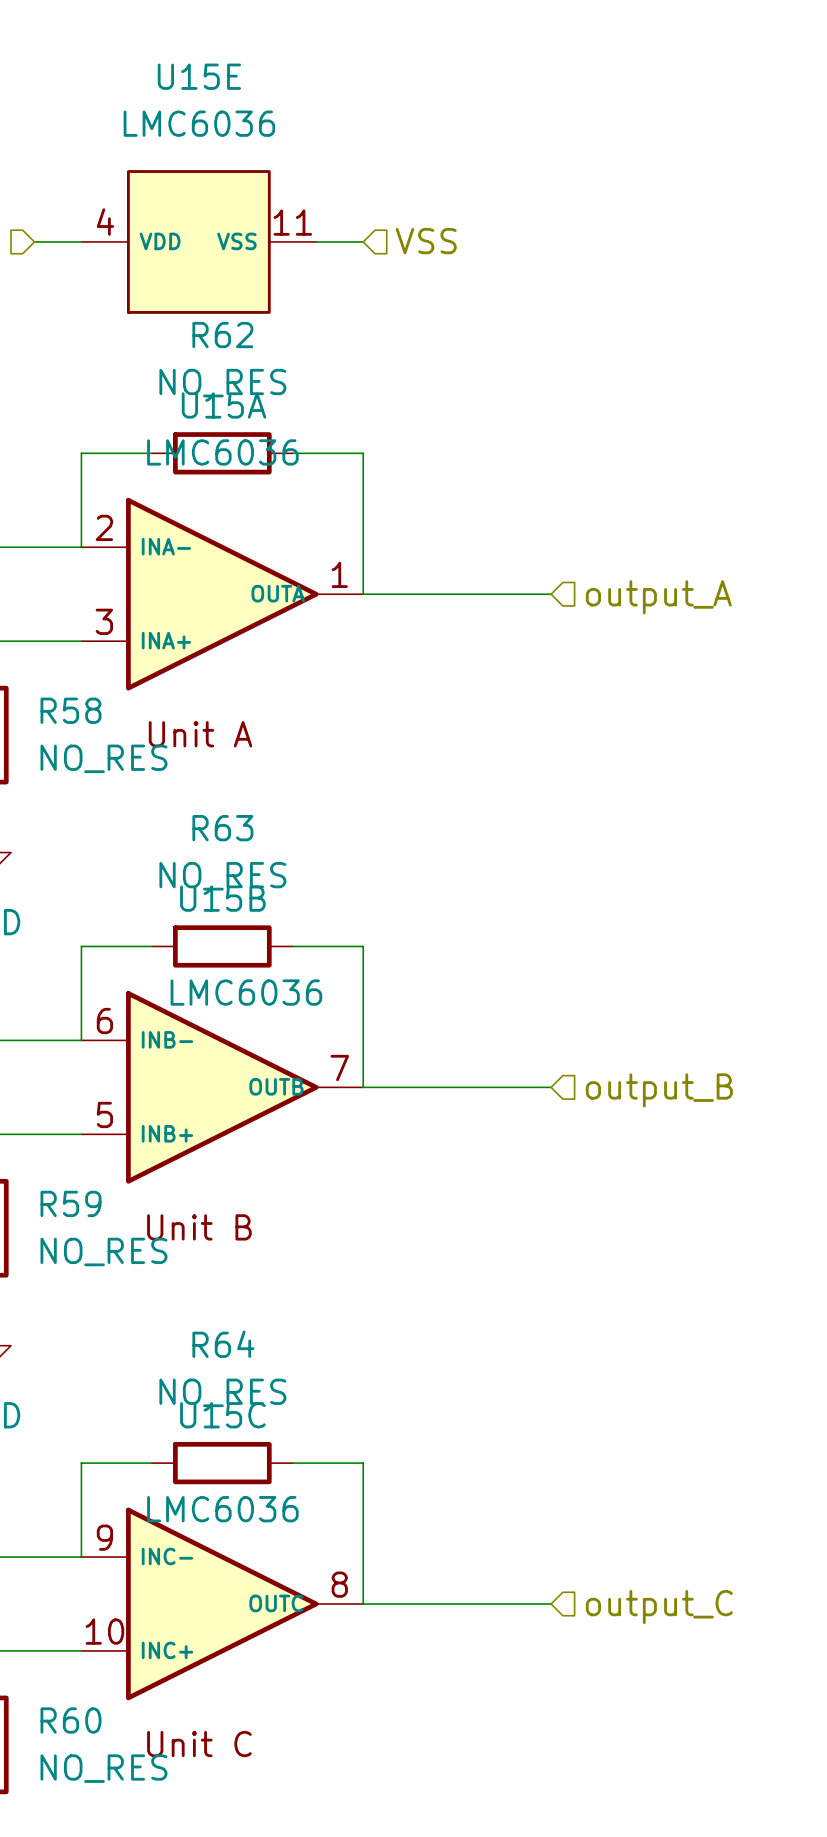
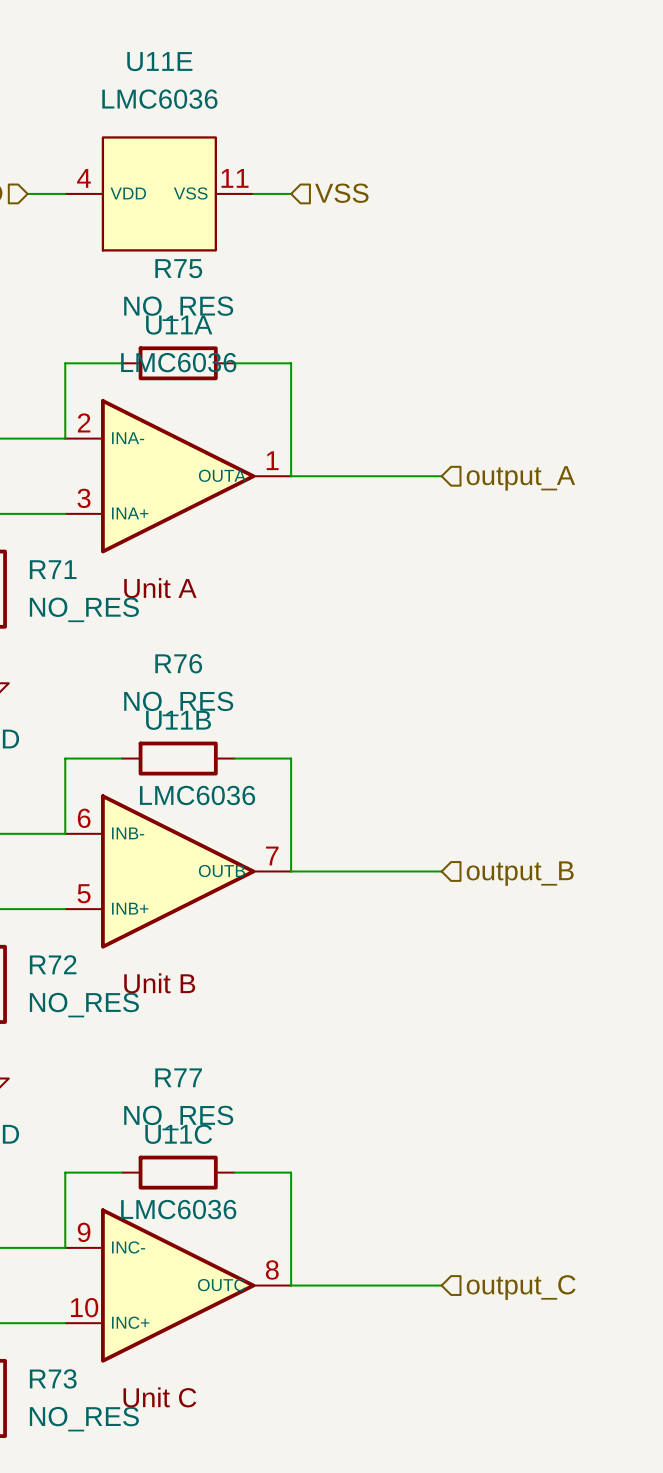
U15E name: U15E (199, 76) -> U11E (159, 61)
R62 name: R62 (222, 335) -> R75 (178, 268)
U15A name: U15A (224, 405) -> U11A (179, 325)
R58 name: R58 (70, 710) -> R71 (53, 569)
R63 name: R63 (222, 828) -> R76 (178, 663)
U15B name: U15B (222, 898) -> U11B (178, 720)
R59 name: R59 (70, 1203) -> R72 (53, 964)
R64 name: R64 (223, 1344) -> R77 (178, 1077)
U15C name: U15C (222, 1415) -> U11C (178, 1134)
R60 name: R60 (70, 1720) -> R73 (53, 1378)

